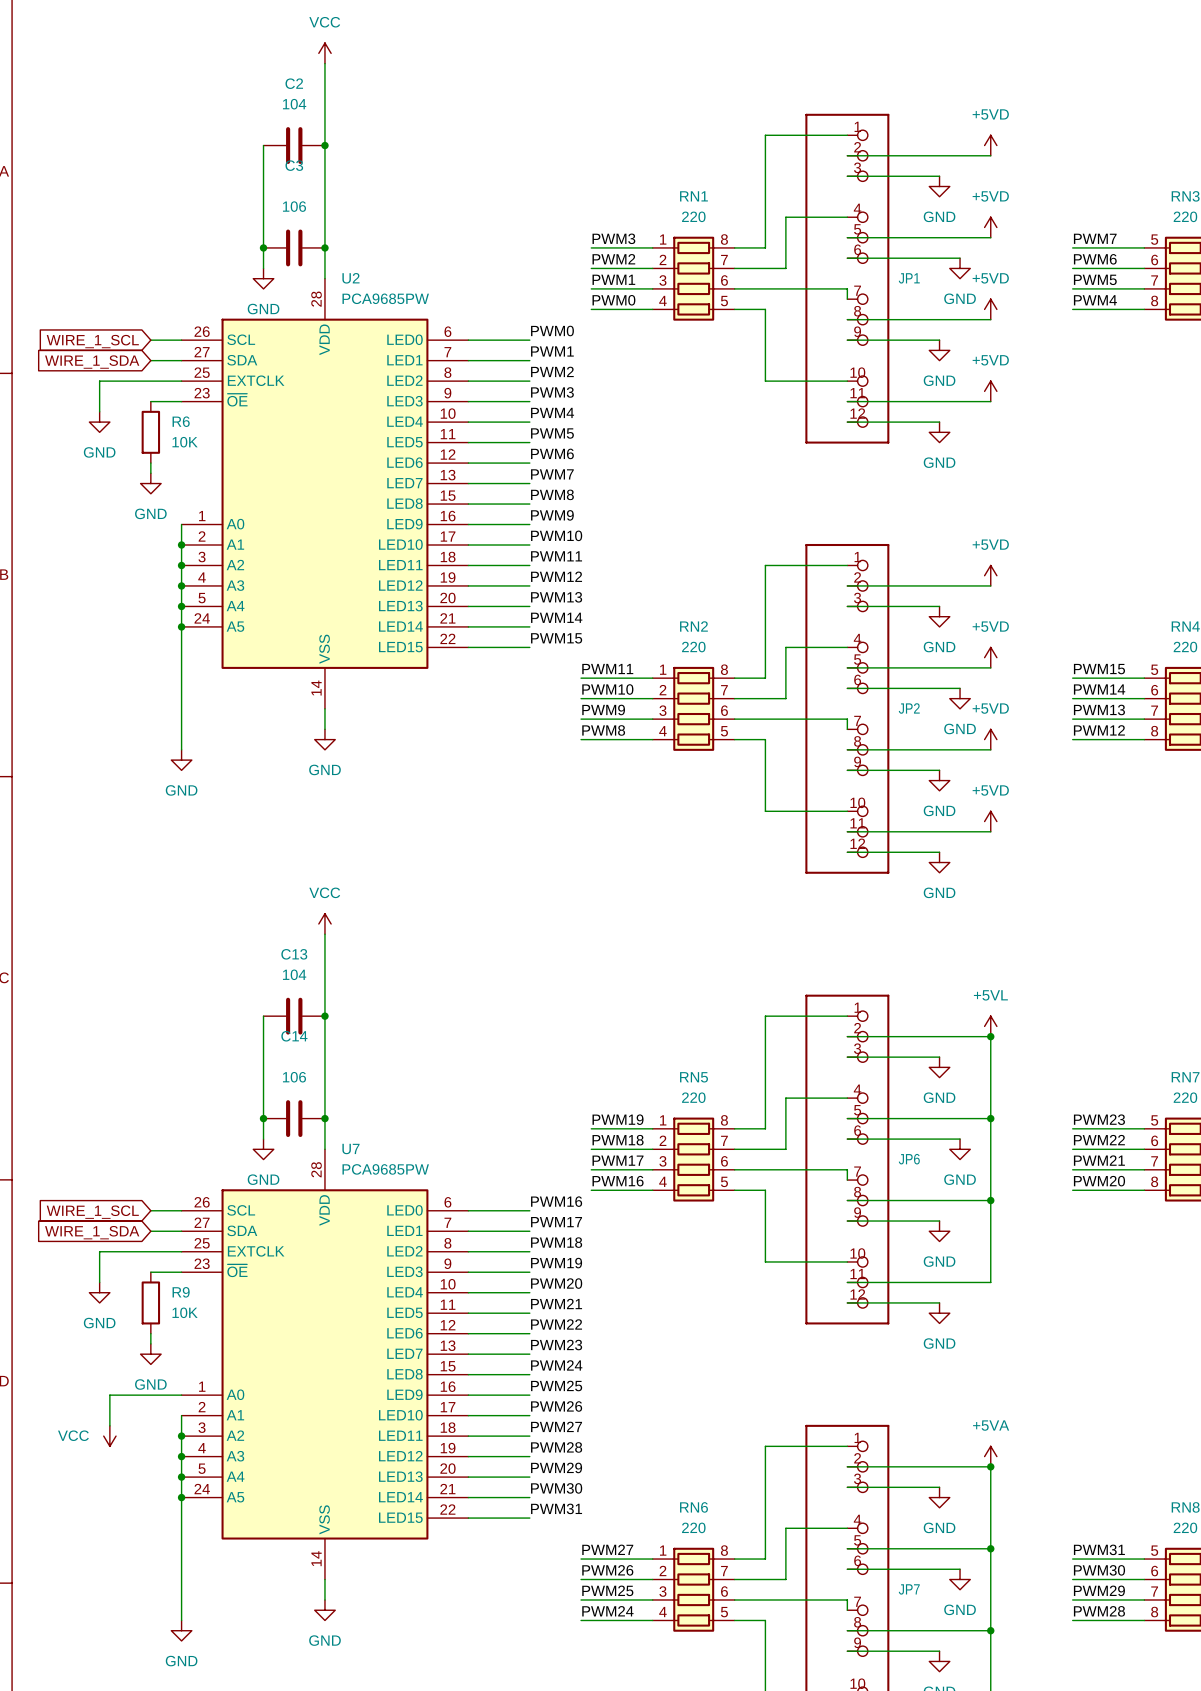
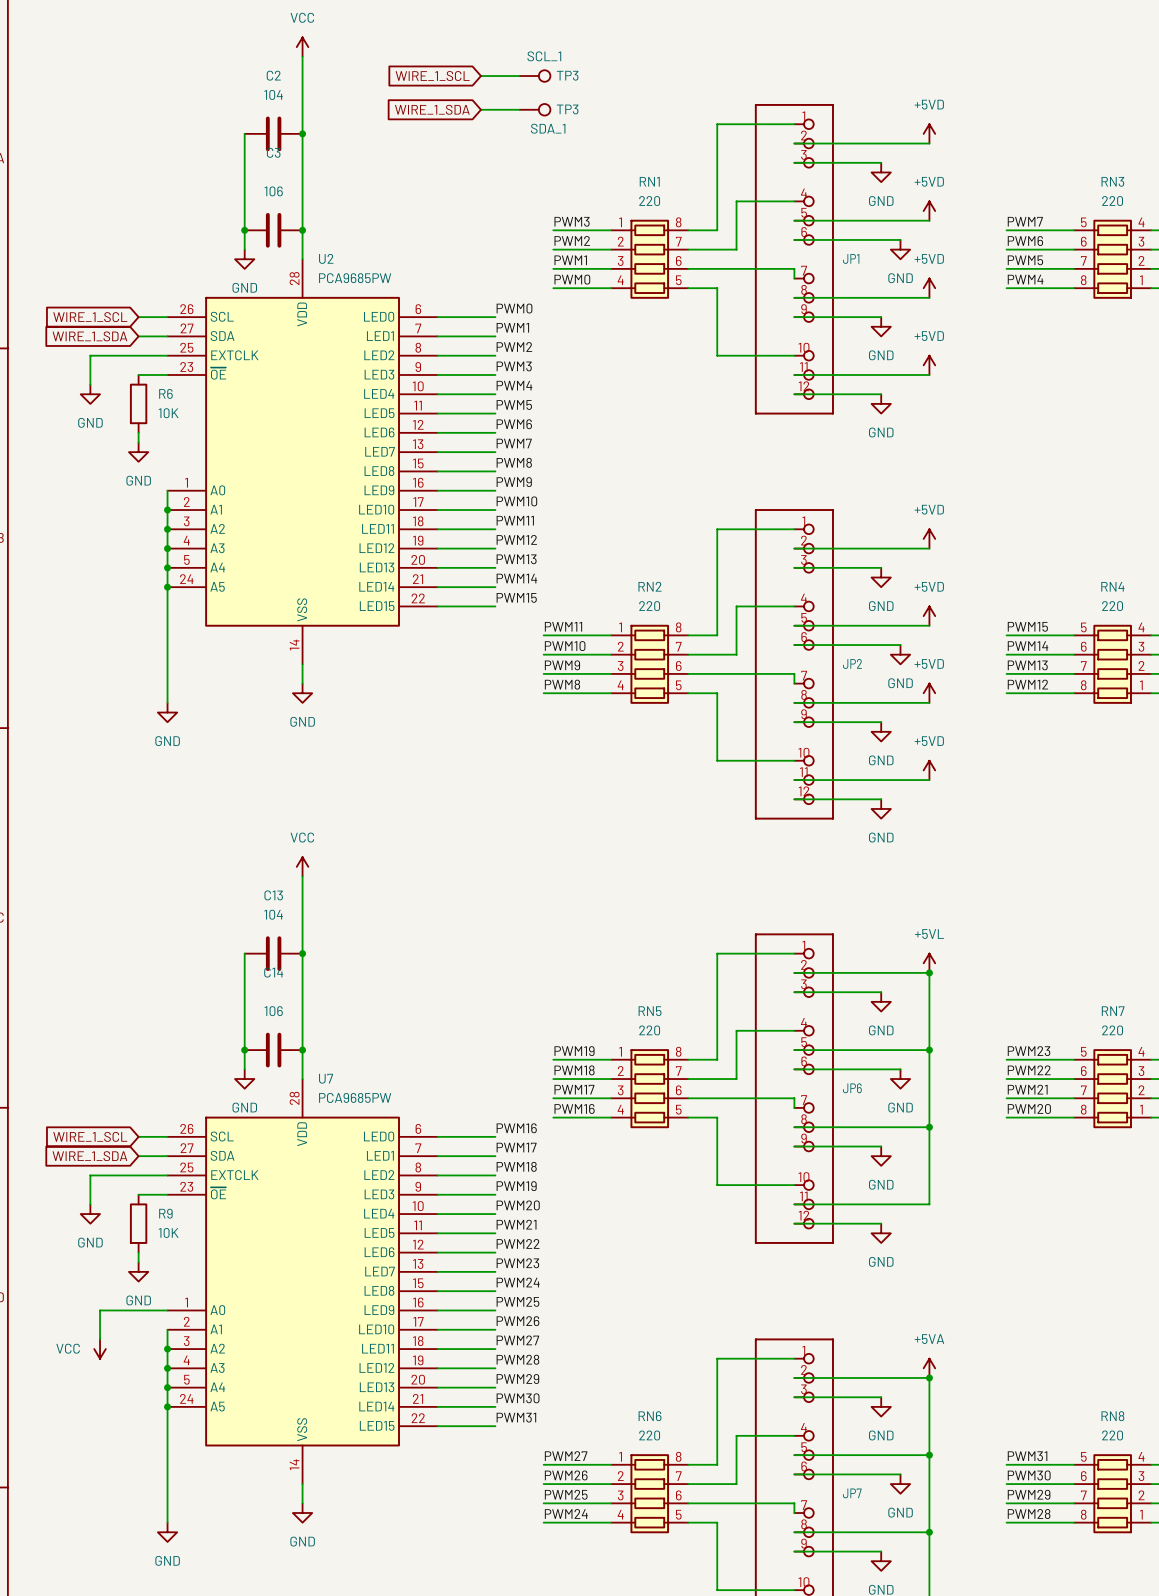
wire: none -> (480, 76) (519, 76)
TP3: none -> SCL_1 (534, 76)
global label: none -> WIRE_1_SCL (432, 76)
wire: none -> (480, 109) (519, 109)
TP3: none -> SDA_1 (534, 109)
global label: none -> WIRE_1_SDA (432, 109)

